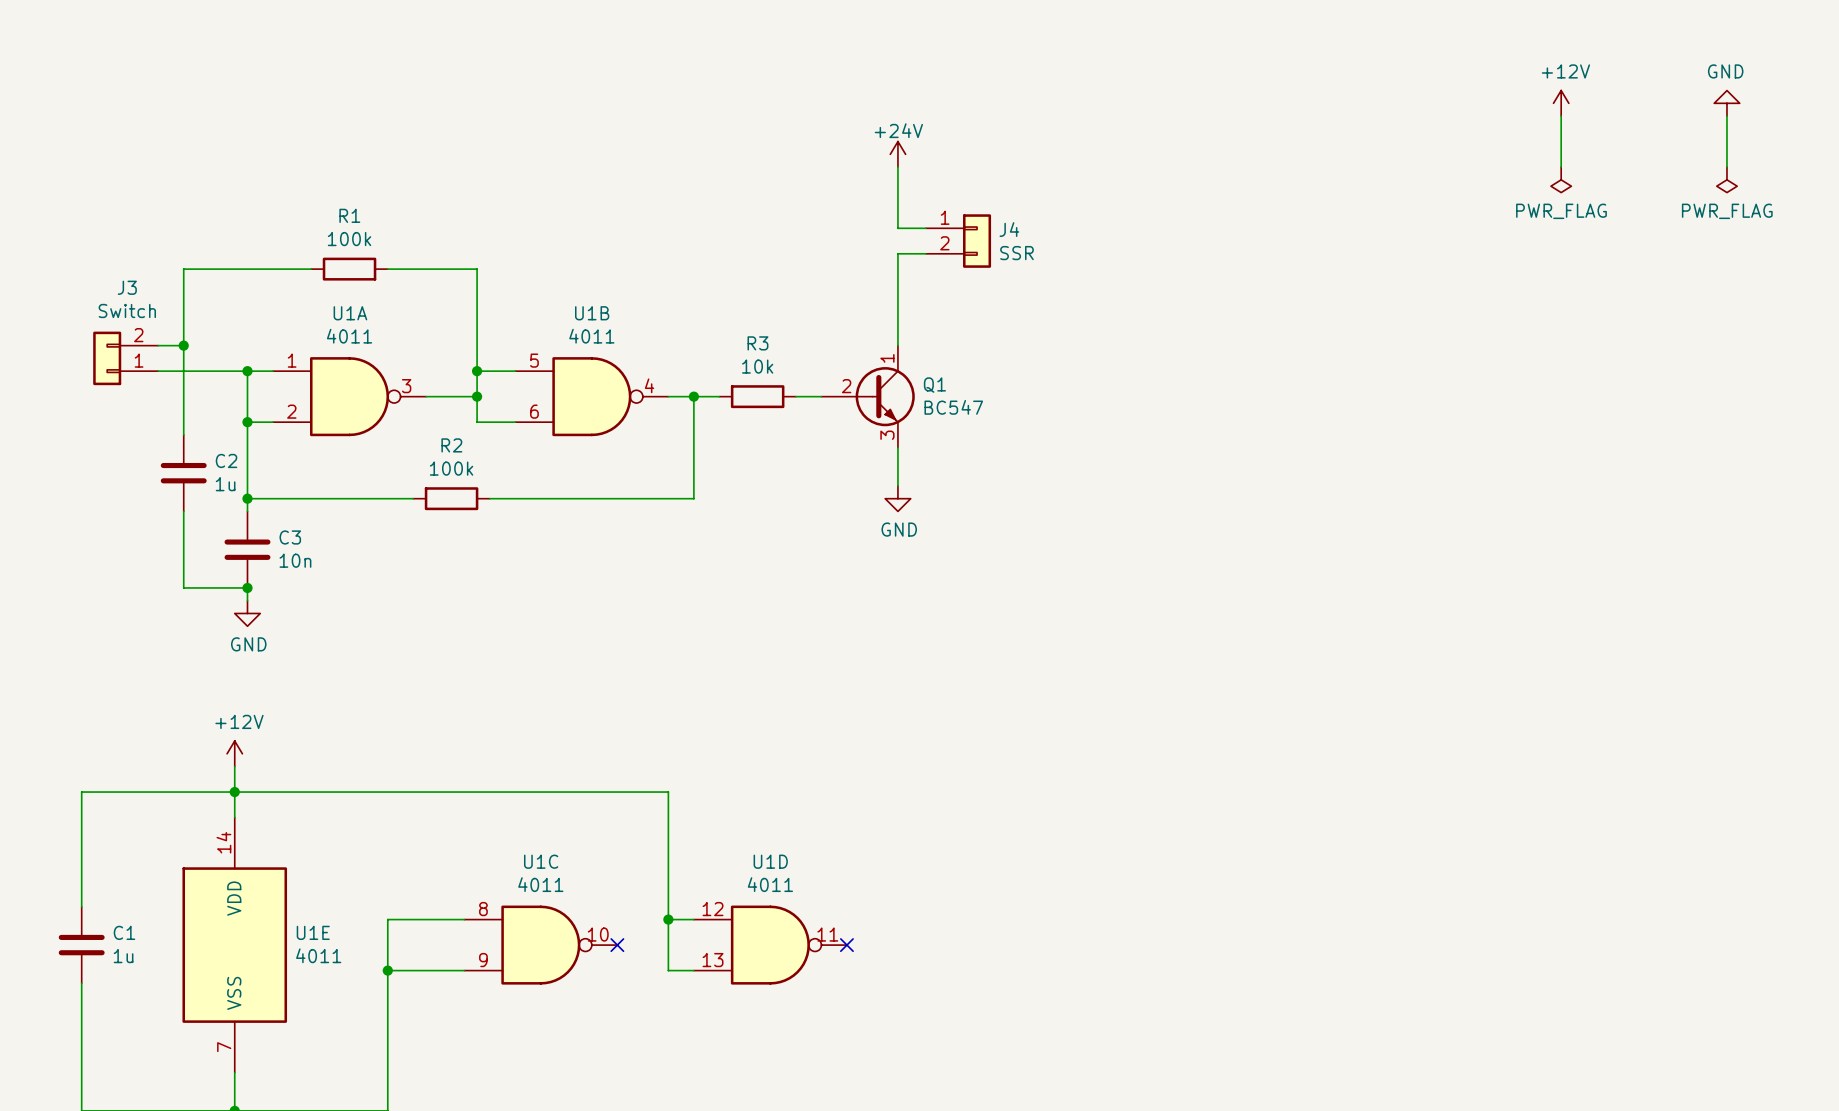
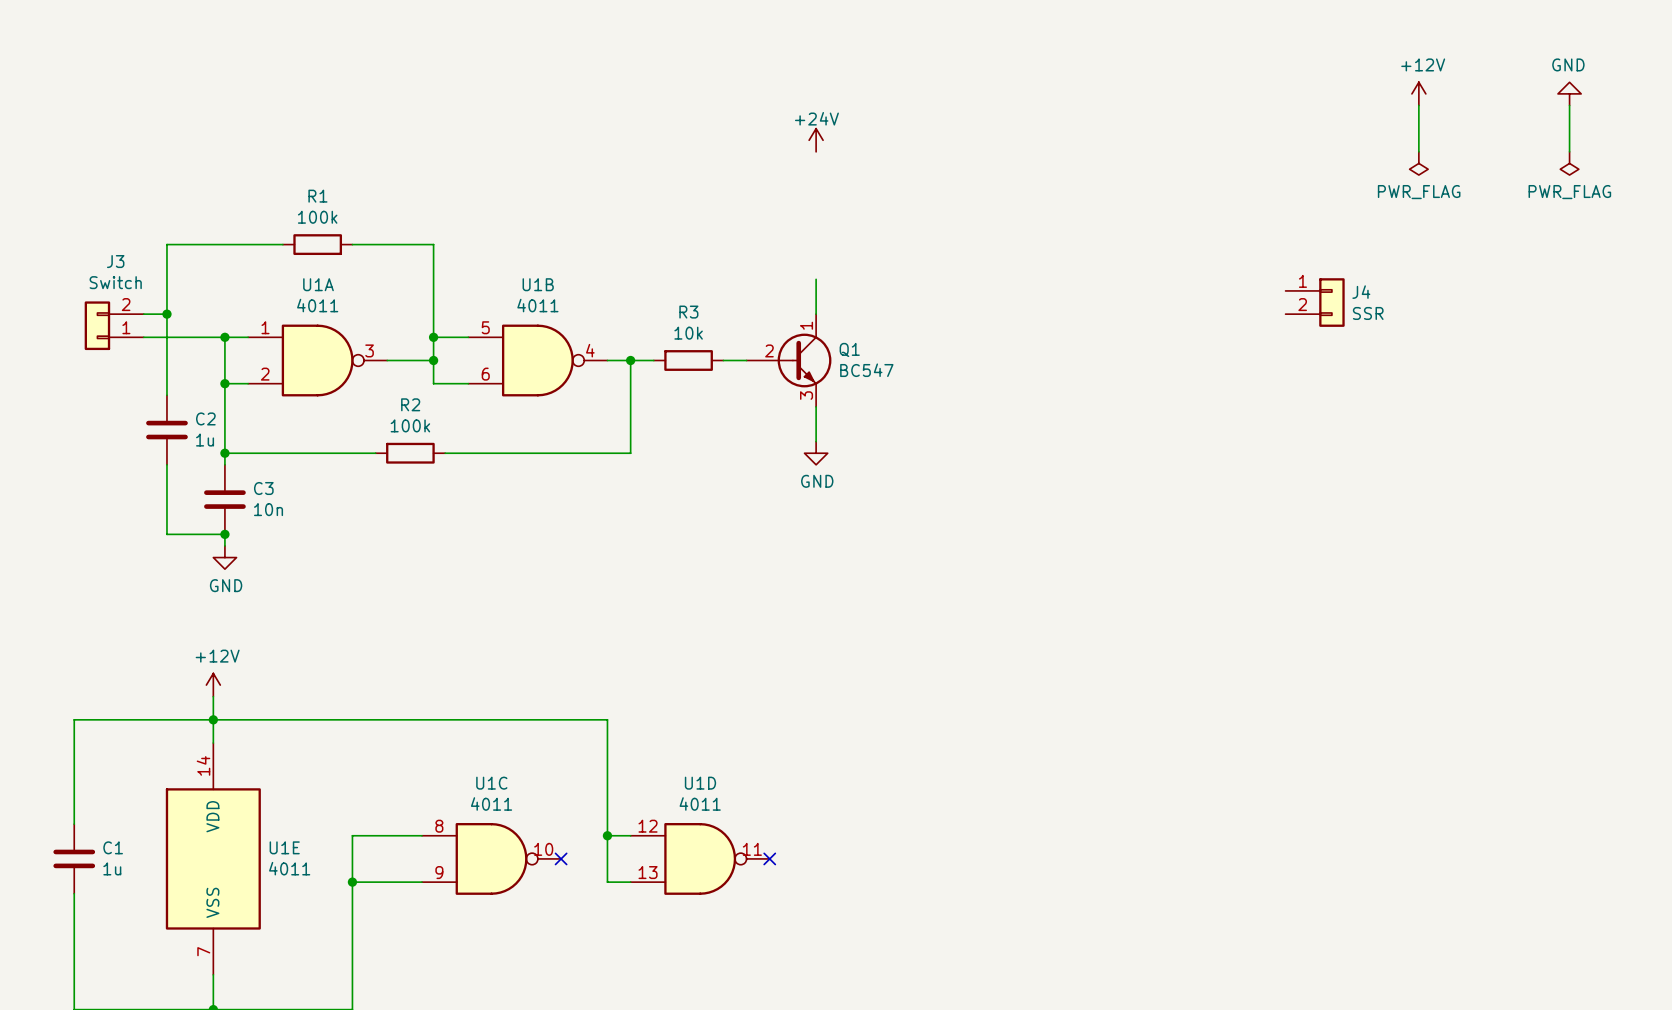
wire: (897, 167) (897, 228) (926, 228) -> none
J4 position: (958, 241) -> (1315, 302)
wire: (926, 253) (897, 253) (897, 307) -> none

